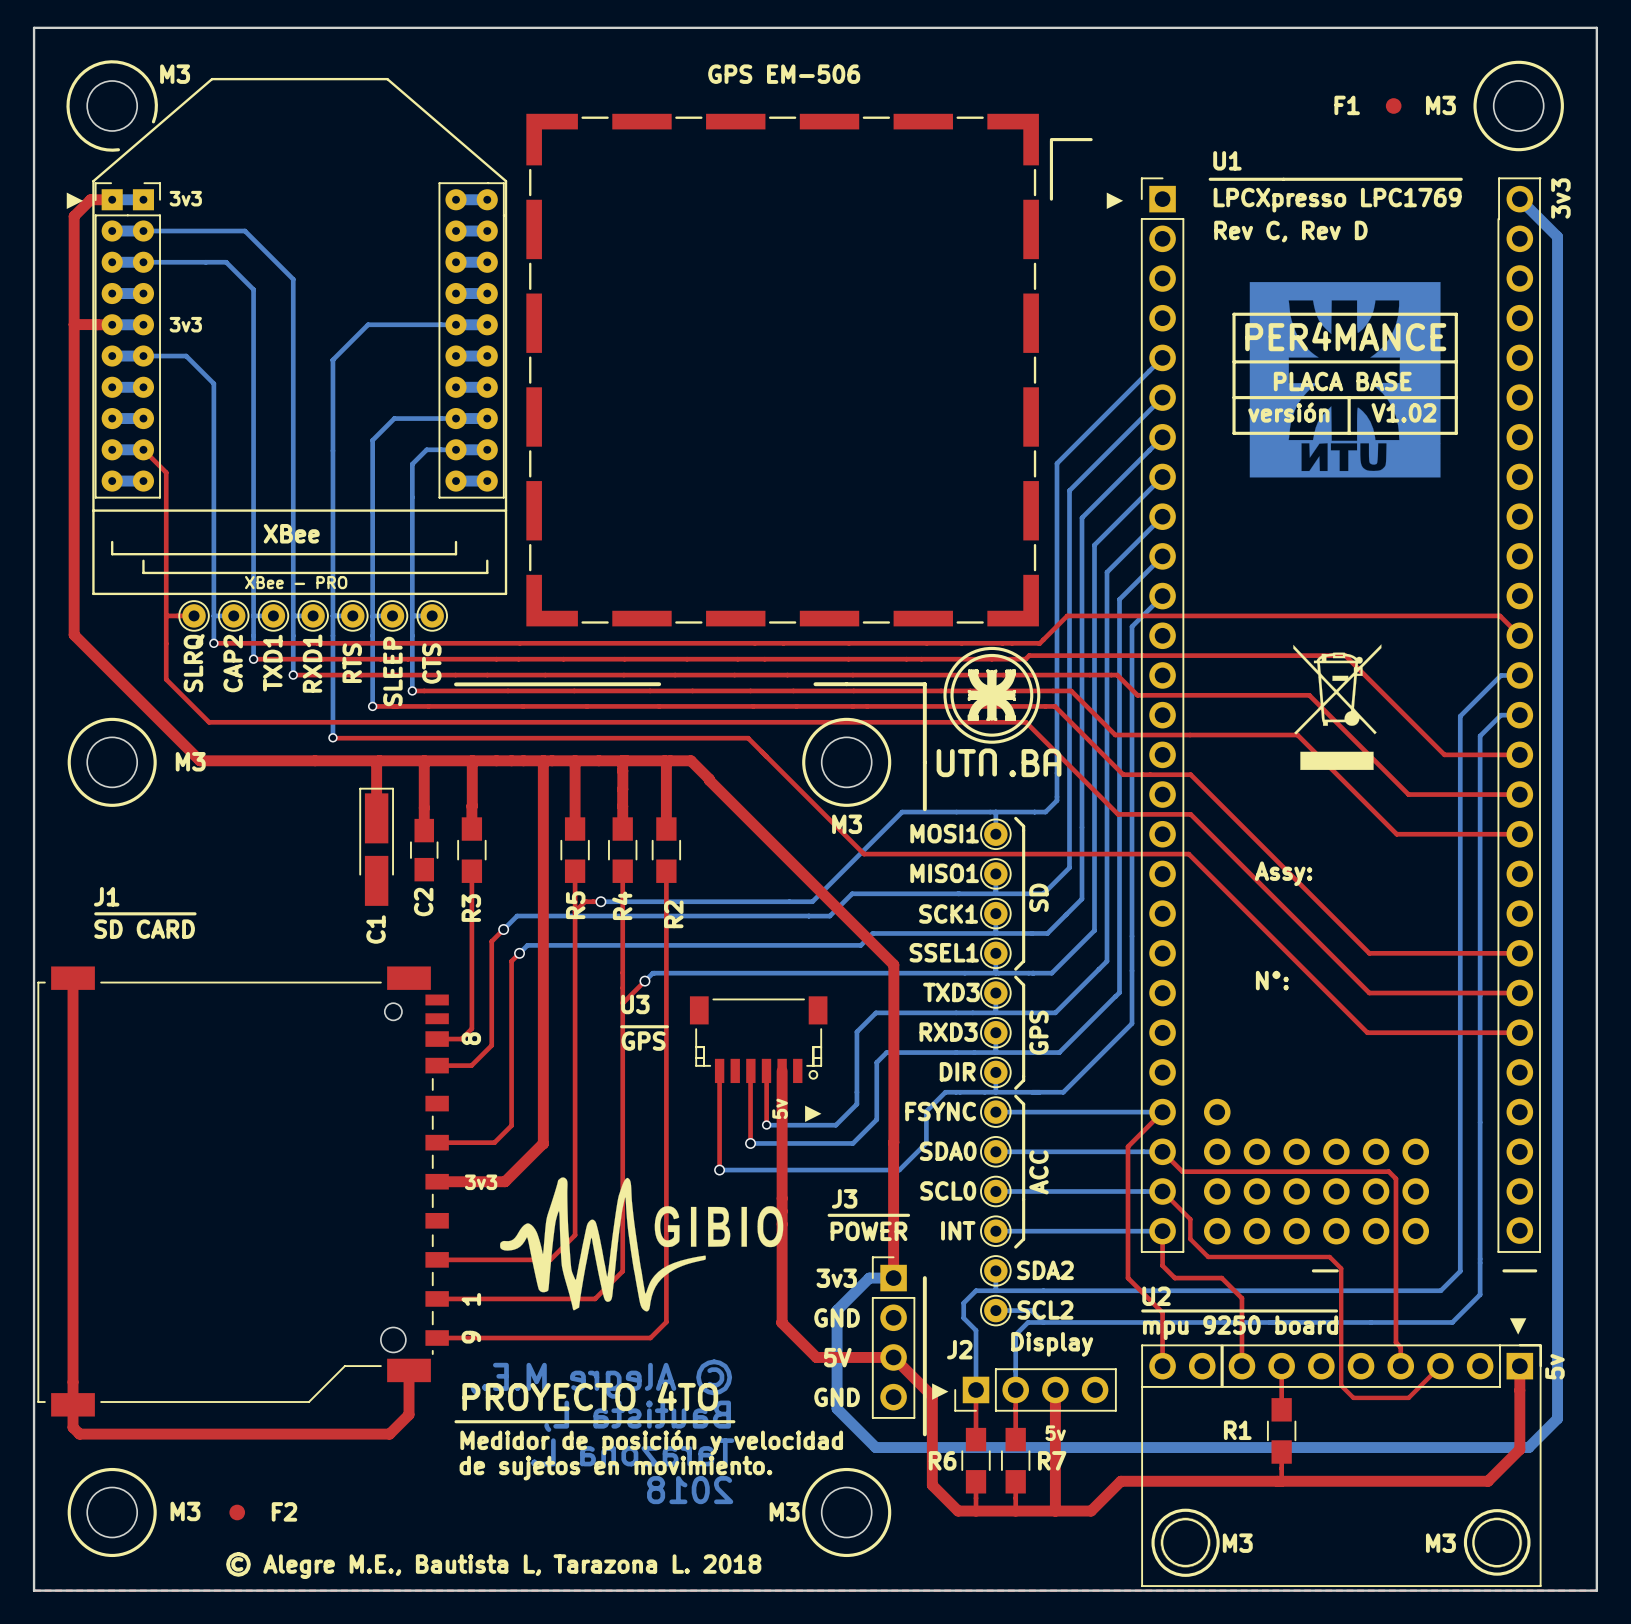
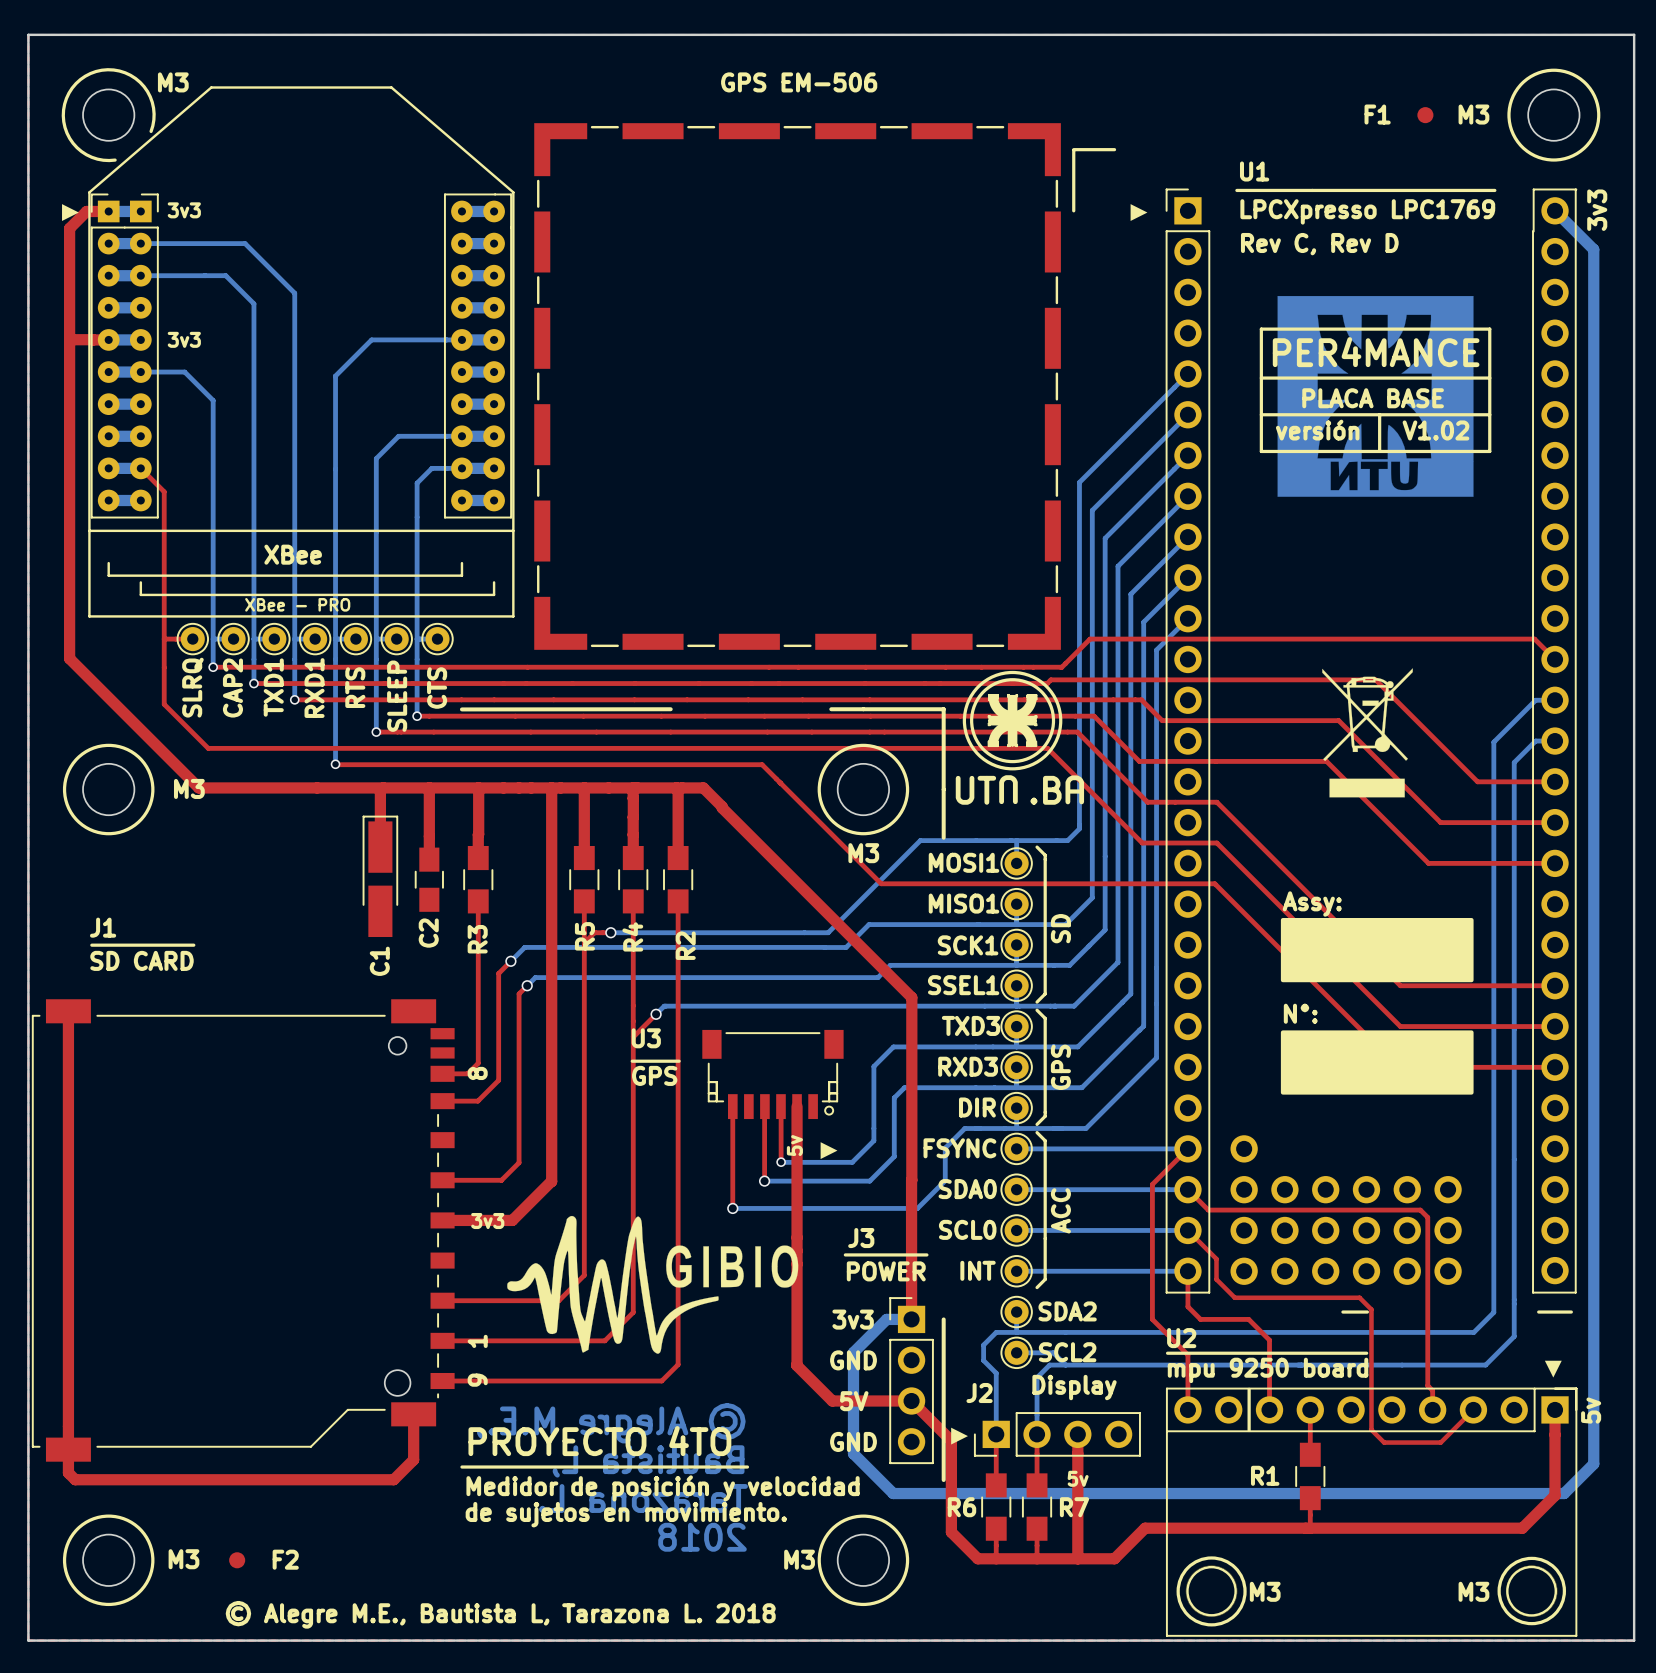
drawing: none -> [1280, 917, 1474, 983]
drawing: none -> [1280, 1030, 1474, 1095]

